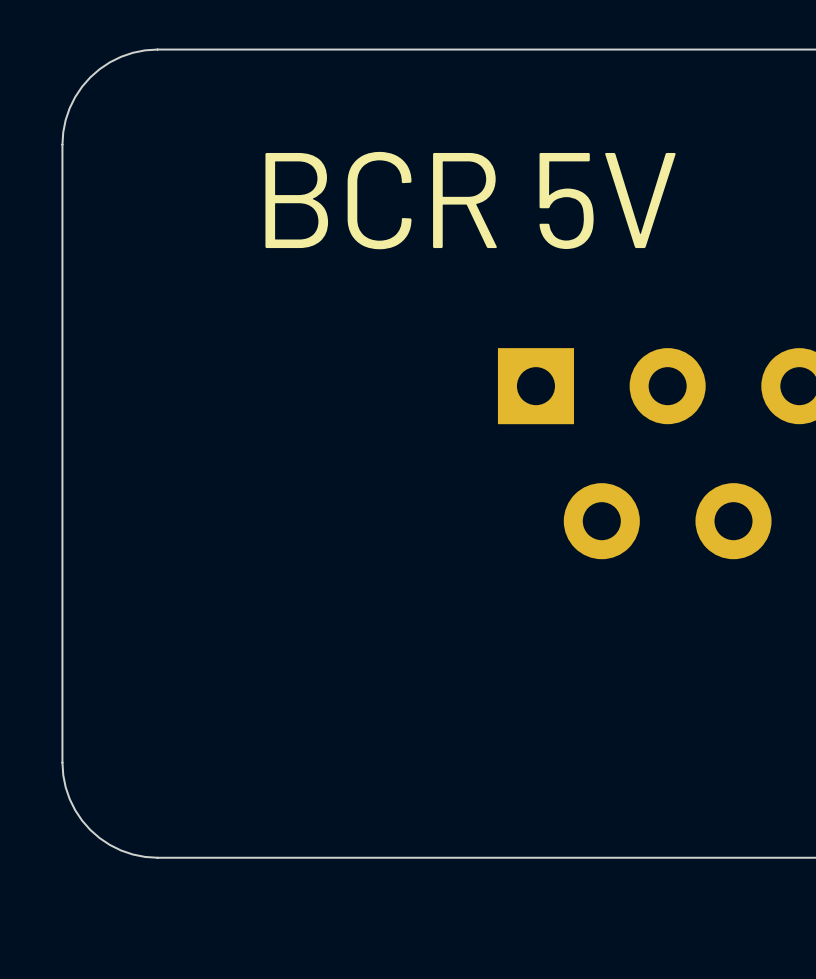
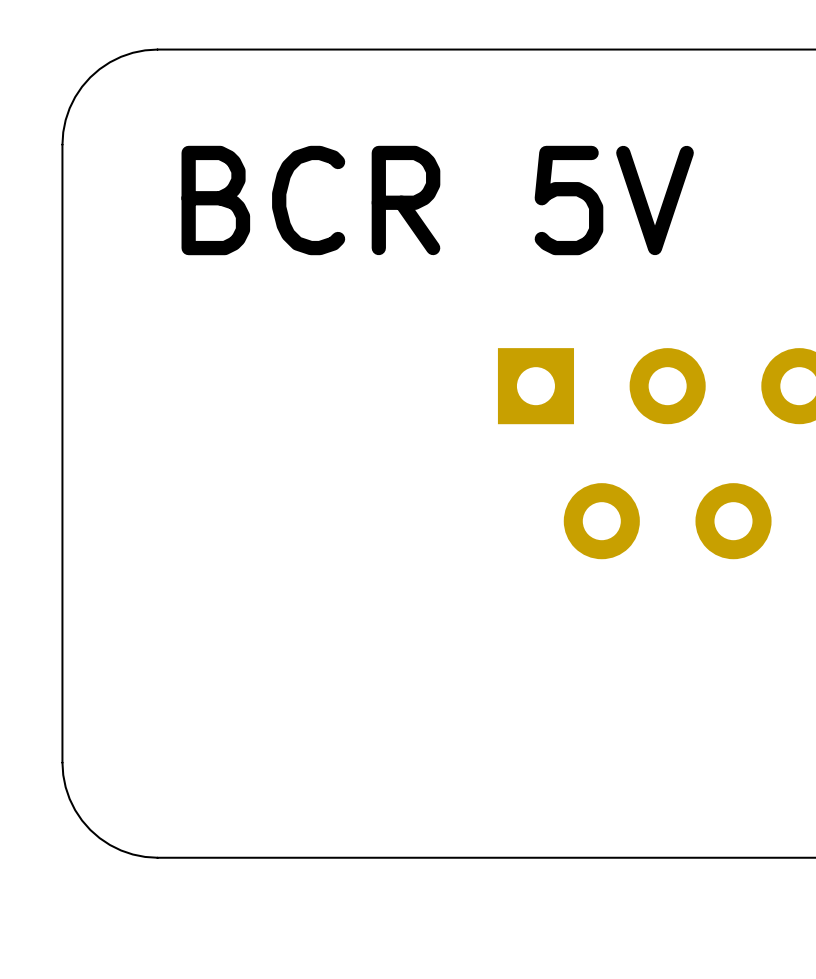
text position: BCR 5V (470, 200) -> BCR 5V (437, 200)

